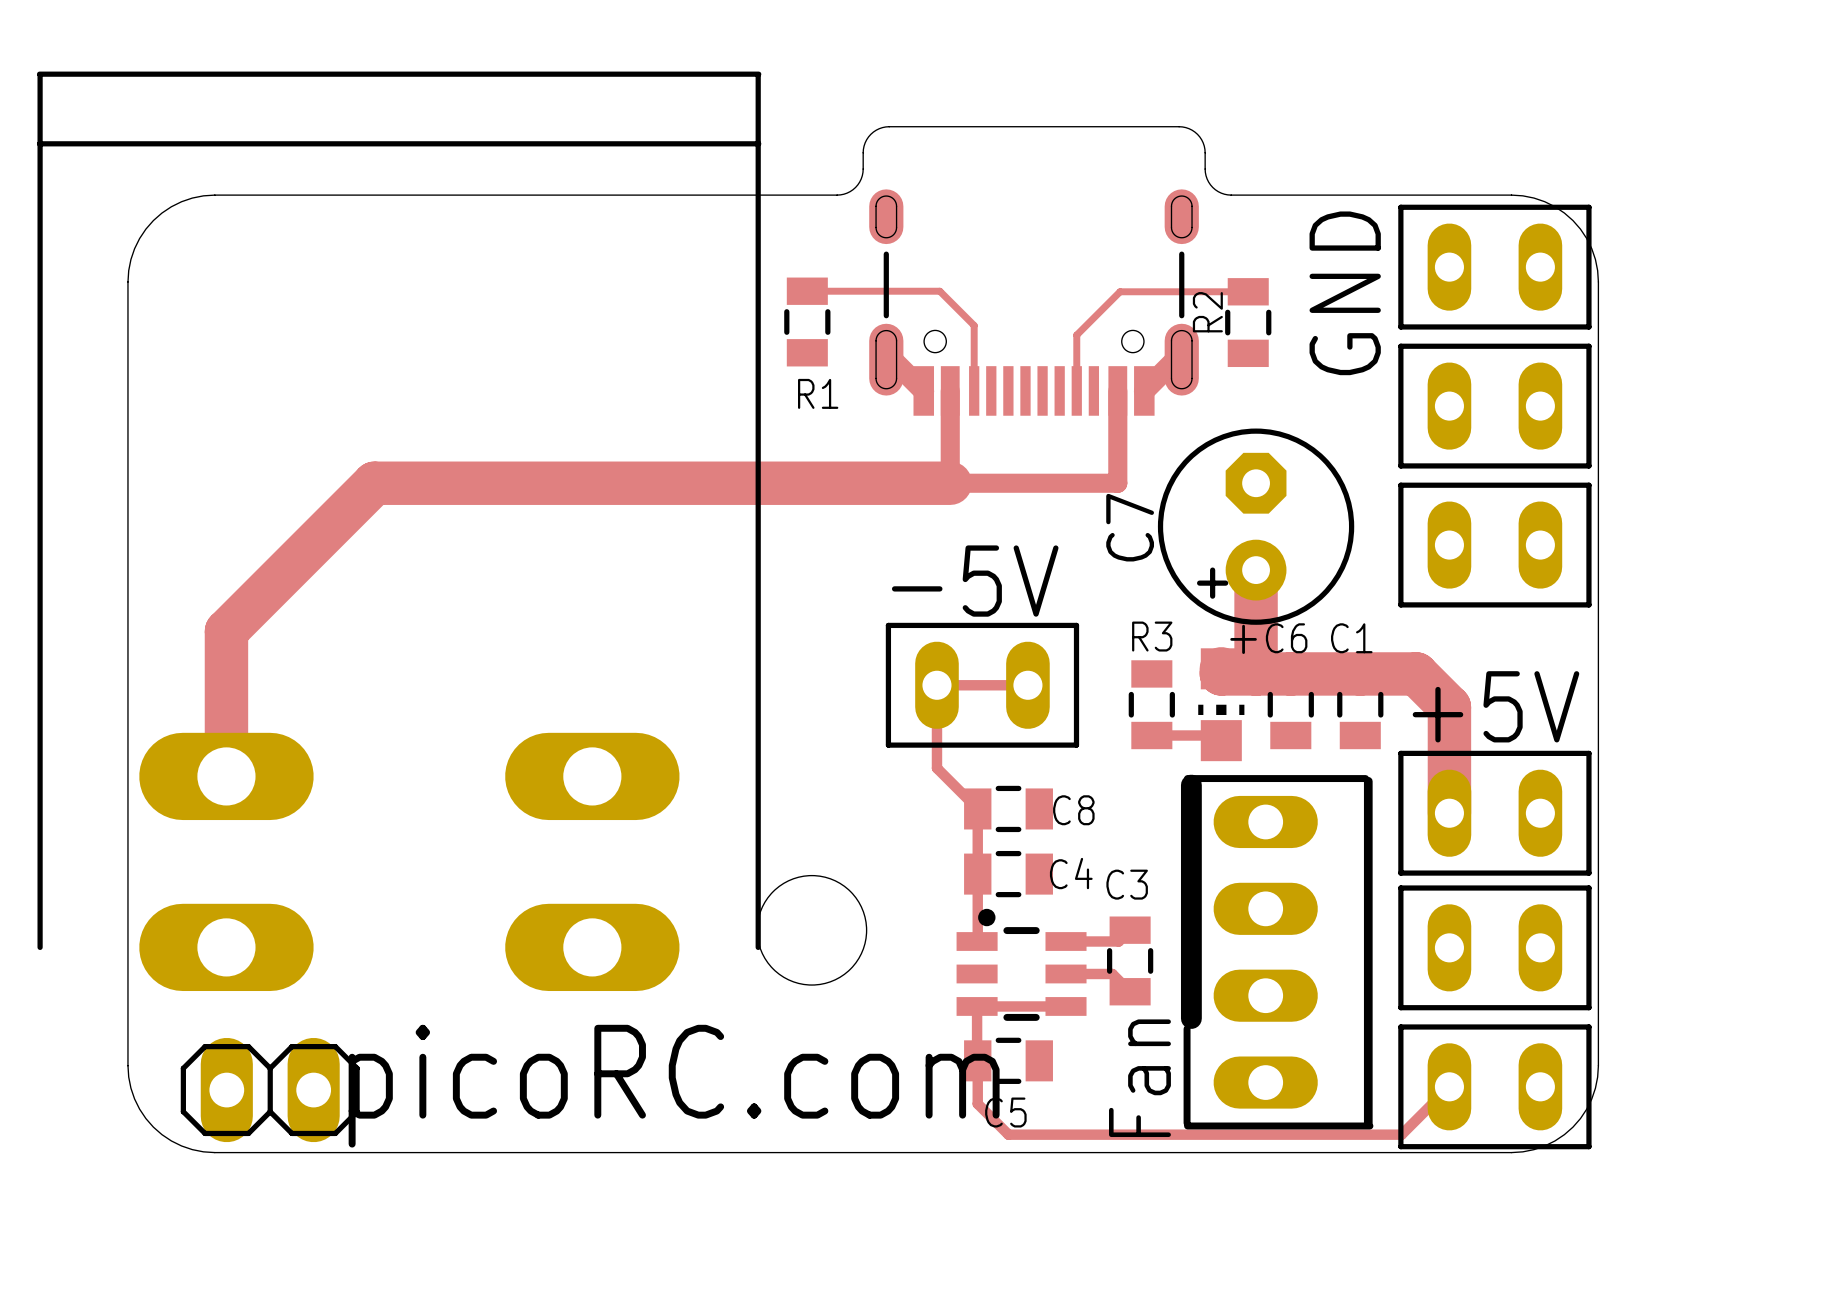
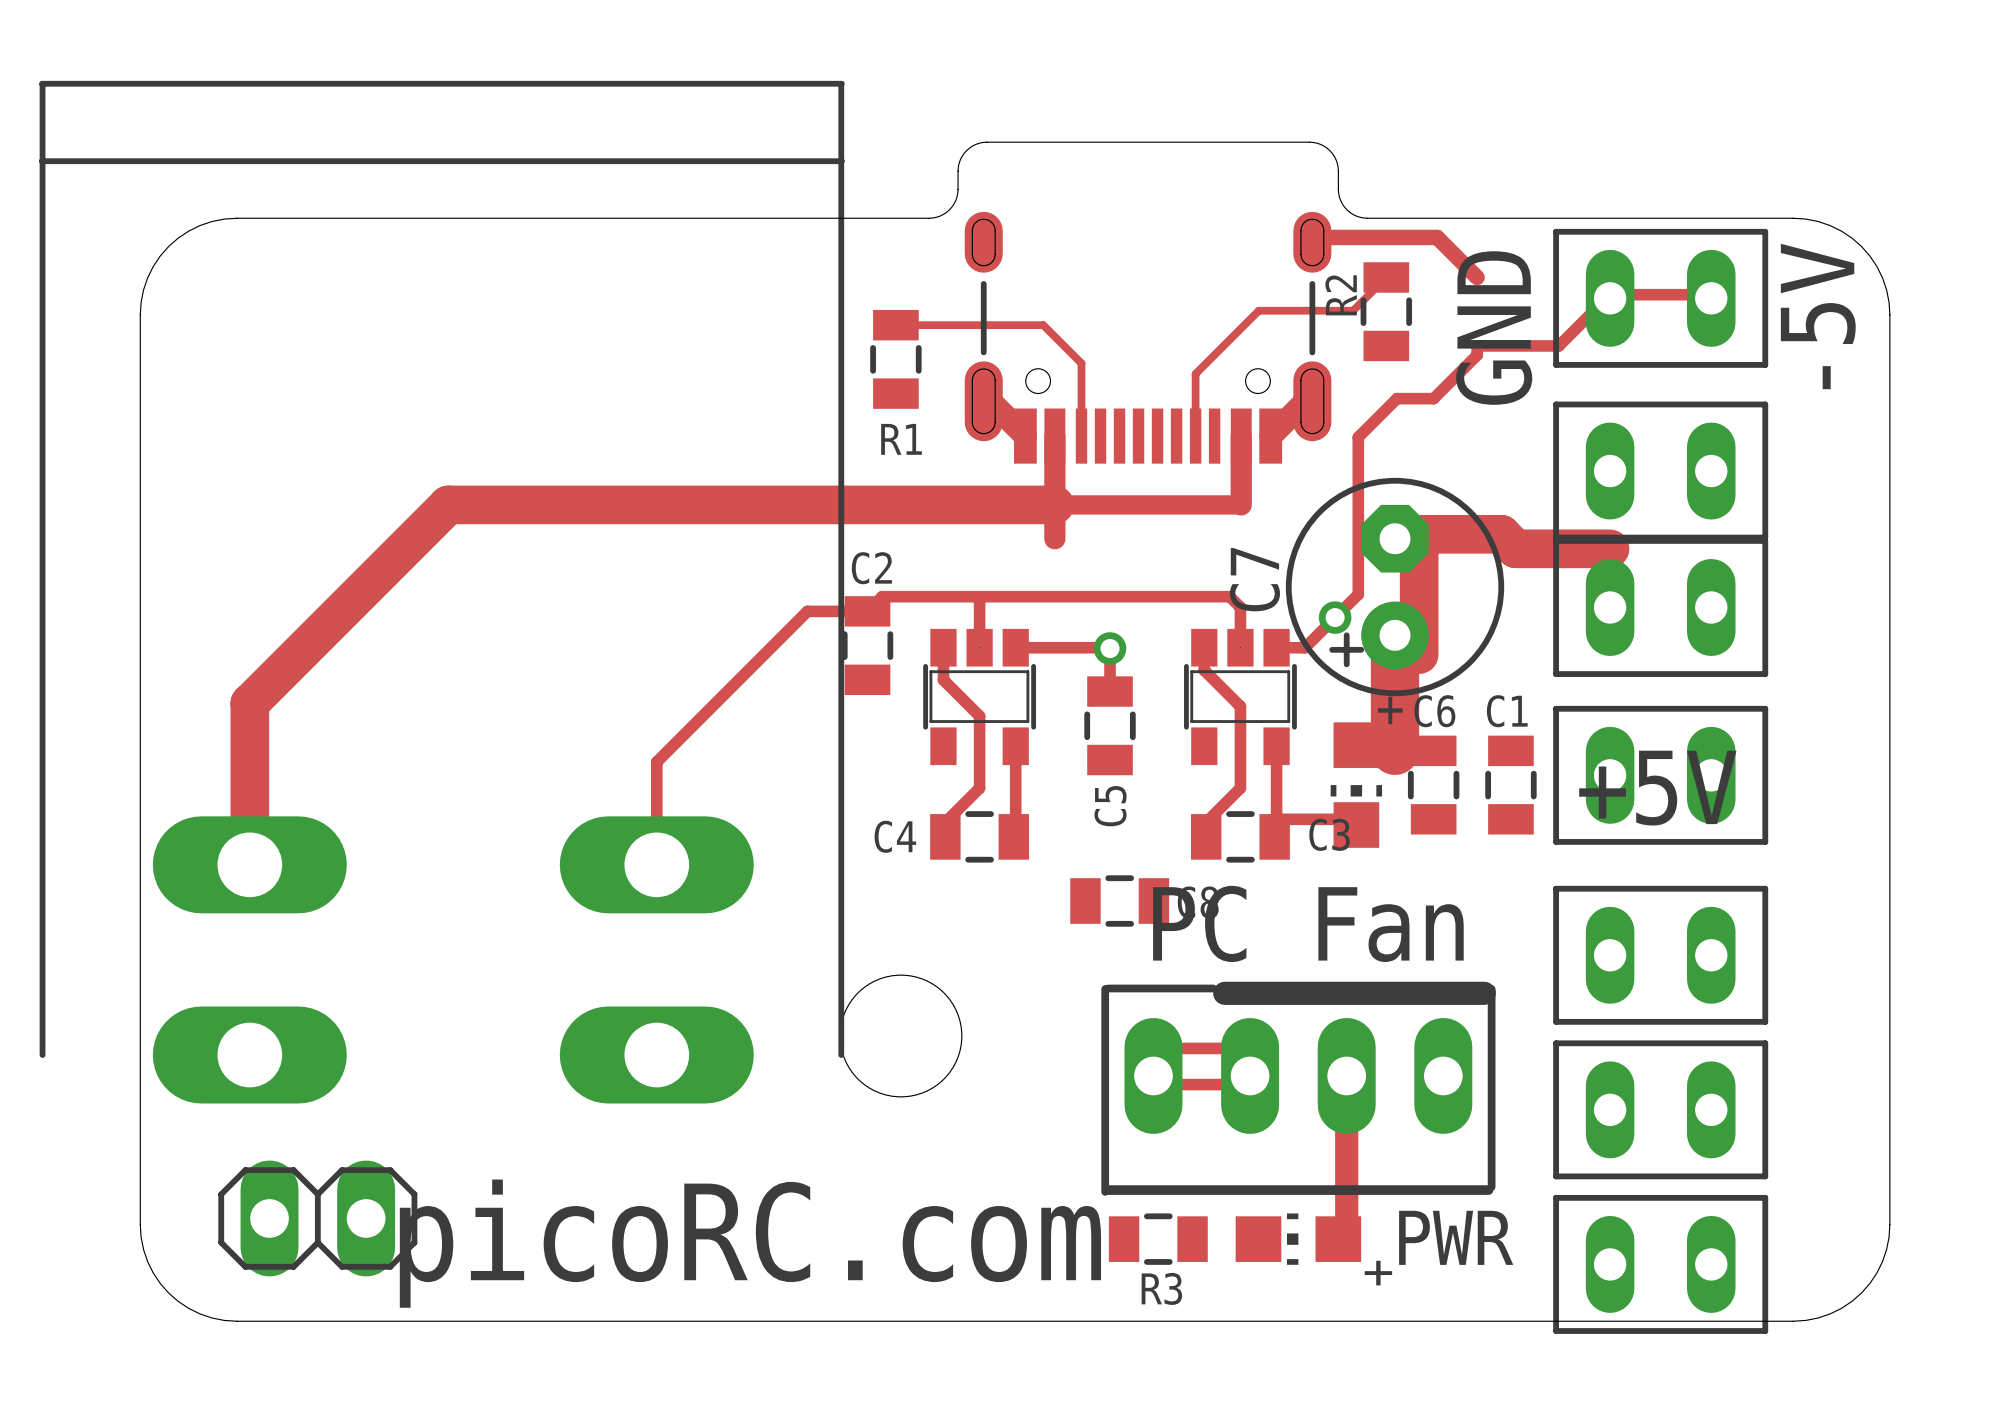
board edge: (1511, 195) (1544, 201) (1572, 220) (1591, 248) (1598, 281) (1598, 1065) (1595, 1088) (1586, 1109) (1572, 1127) (1554, 1140) (1534, 1149) (1511, 1152) (214, 1152) (181, 1145) (153, 1127) (134, 1098) (127, 1065) -> (1679, 218) (1793, 218) (1818, 221) (1830, 225) (1852, 238) (1869, 256) (1882, 277) (1889, 302) (1889, 1224) (1886, 1249) (1876, 1272) (1861, 1292) (1841, 1308) (1818, 1317) (1793, 1321) (224, 1320) (199, 1313) (178, 1301) (168, 1292) (153, 1272) (143, 1249) (141, 1237) (140, 1186)
track: none -> (1312, 242) (1317, 237) (1437, 237) (1477, 277)
track: none -> (1711, 294) (1610, 294) (1558, 345) (1477, 345) (1477, 355) (1433, 398) (1396, 398) (1358, 437) (1358, 594) (1304, 647) (1276, 647)
track: (1120, 291) (1248, 291) -> (1243, 325) (1258, 310) (1353, 310) (1386, 277)
R2 position: (1248, 322) -> (1386, 311)
part position: (1494, 406) -> (1660, 471)
track: (1117, 452) (1117, 483) (374, 483) -> (1241, 504) (448, 504) (414, 538)
track width: thick (374, 483) (226, 631) (226, 776) -> thin (414, 538) (249, 703) (249, 864)
track: none -> (1610, 548) (1515, 548) (1501, 534) (1409, 534) (1419, 543) (1419, 654)
track: none -> (980, 596) (979, 647)
via: none -> (1335, 617)
C2: none -> (867, 645)
track: none -> (943, 647) (943, 679) (979, 716) (979, 788) (945, 822) (945, 836)
track: none -> (1015, 647) (1109, 647) (1110, 691)
text rotation: 0° (975, 581) -> 90° counterclockwise (1818, 316)
text position: -5V (975, 581) -> -5V (1818, 316)
via: none -> (1110, 648)
track: none -> (1204, 647) (1204, 670) (1240, 706) (1240, 788) (1206, 822) (1206, 836)
track: none -> (1240, 647) (1240, 607) (1229, 596) (882, 596) (867, 611) (807, 611) (656, 762) (656, 864)
part: none -> (979, 696)
part: none -> (1240, 696)
track: (1221, 668) (1221, 673) (1416, 673) (1449, 707) (1449, 813) -> none
track: none -> (1015, 746) (1015, 834) (1013, 836)
track: none -> (1276, 746) (1276, 834) (1274, 836)
part: (982, 685) -> none
track: (1027, 685) (936, 685) (936, 768) (977, 808) (977, 941) -> none
part: none -> (1660, 775)
R3 rotation: 0° (1151, 704) -> 90° clockwise (1158, 1239)
R3 position: (1151, 704) -> (1158, 1239)
part position: (1494, 813) -> (1660, 955)
text: none -> PC Fan (1308, 923)
C4 name position: C4 (1071, 873) -> C4 (895, 836)
C4 position: (1008, 874) -> (979, 836)
part: (1494, 947) -> none
part rotation: 0° (1277, 952) -> 90° clockwise (1298, 1088)
C3 rotation: 0° (1130, 960) -> 90° clockwise (1240, 836)
C3 position: (1130, 960) -> (1240, 836)
part: (1021, 964) -> none
track: none -> (1346, 1075) (1346, 1230) (1338, 1239)
part: none -> (1660, 1109)
track: (1066, 1006) (977, 1006) (977, 1103) (1008, 1134) (1401, 1134) (1449, 1086) -> none
C5 rotation: 0° (1008, 1060) -> 90° clockwise (1110, 725)
C5 position: (1008, 1060) -> (1110, 725)
text: Fan (1139, 1078) -> none
text position: picoRC.com (674, 1086) -> picoRC.com (750, 1243)
part: (1494, 1086) -> none
part position: (270, 1090) -> (317, 1218)
text: none -> PWR (1456, 1237)
part: none -> (1298, 1239)
part: none -> (1660, 1264)

